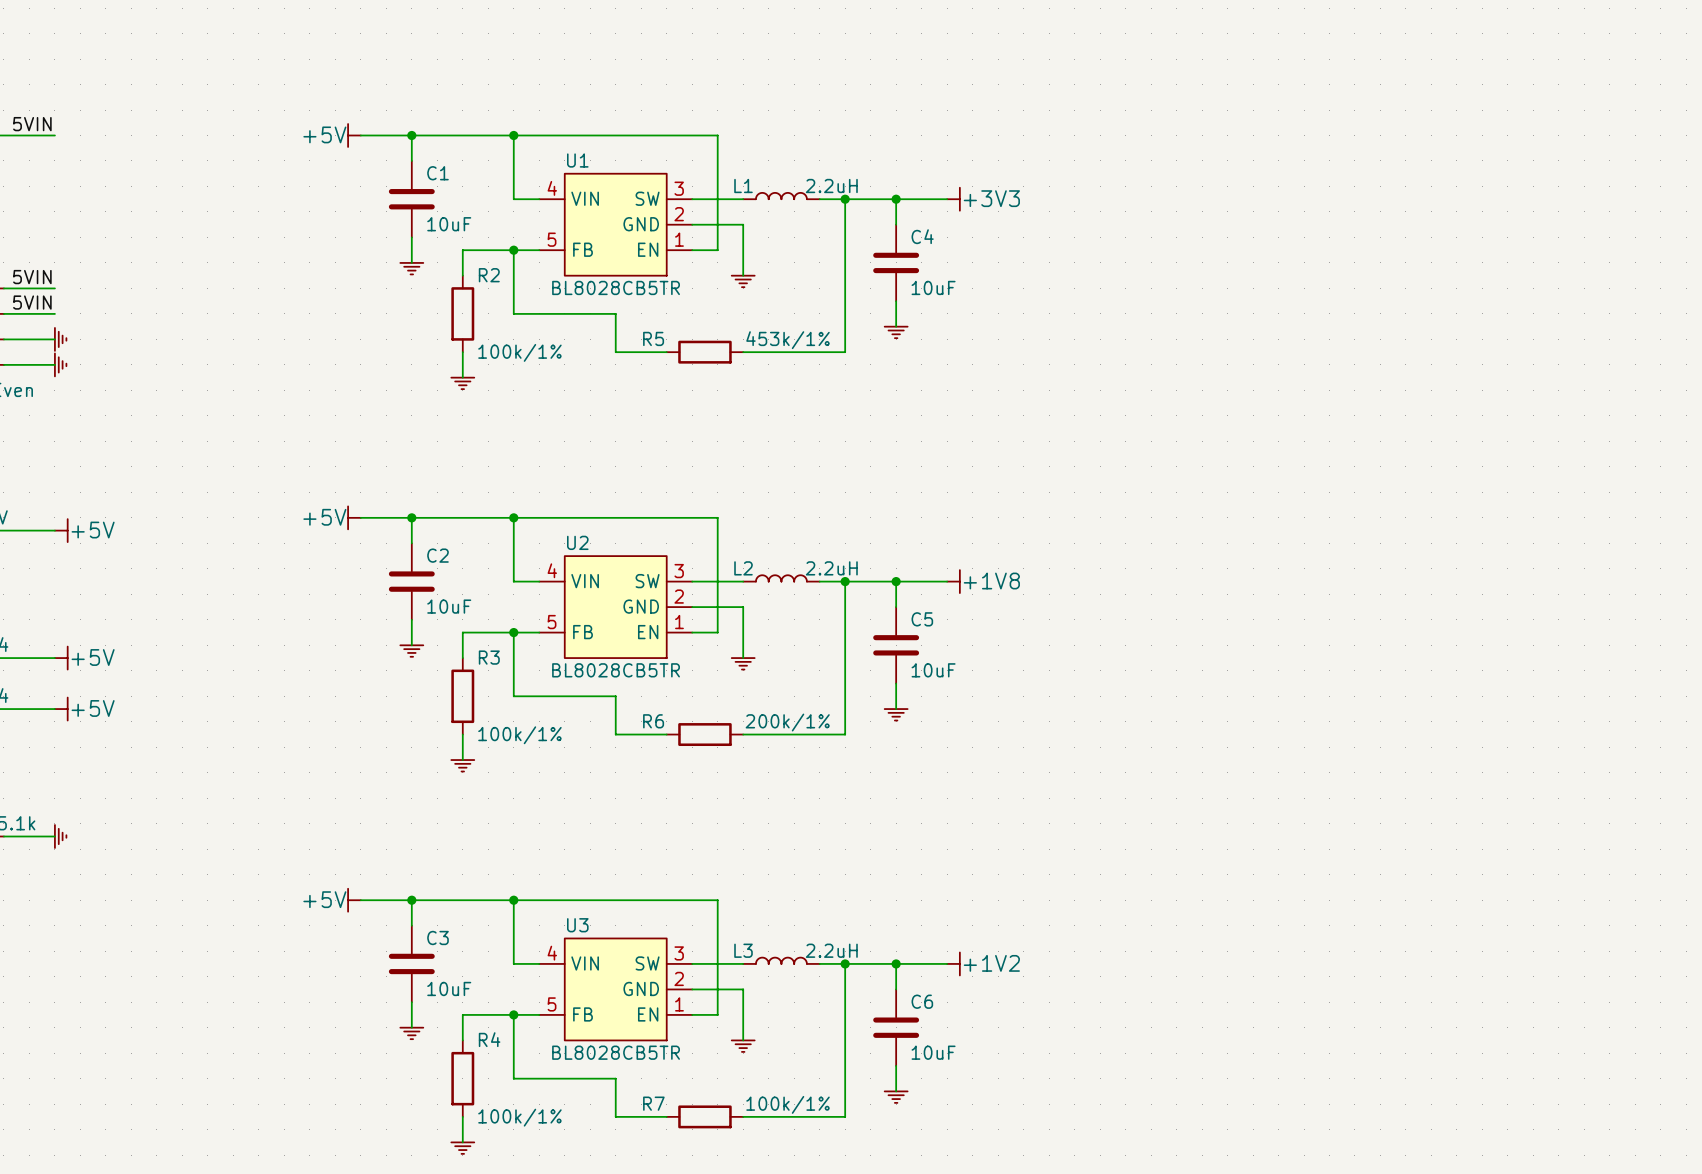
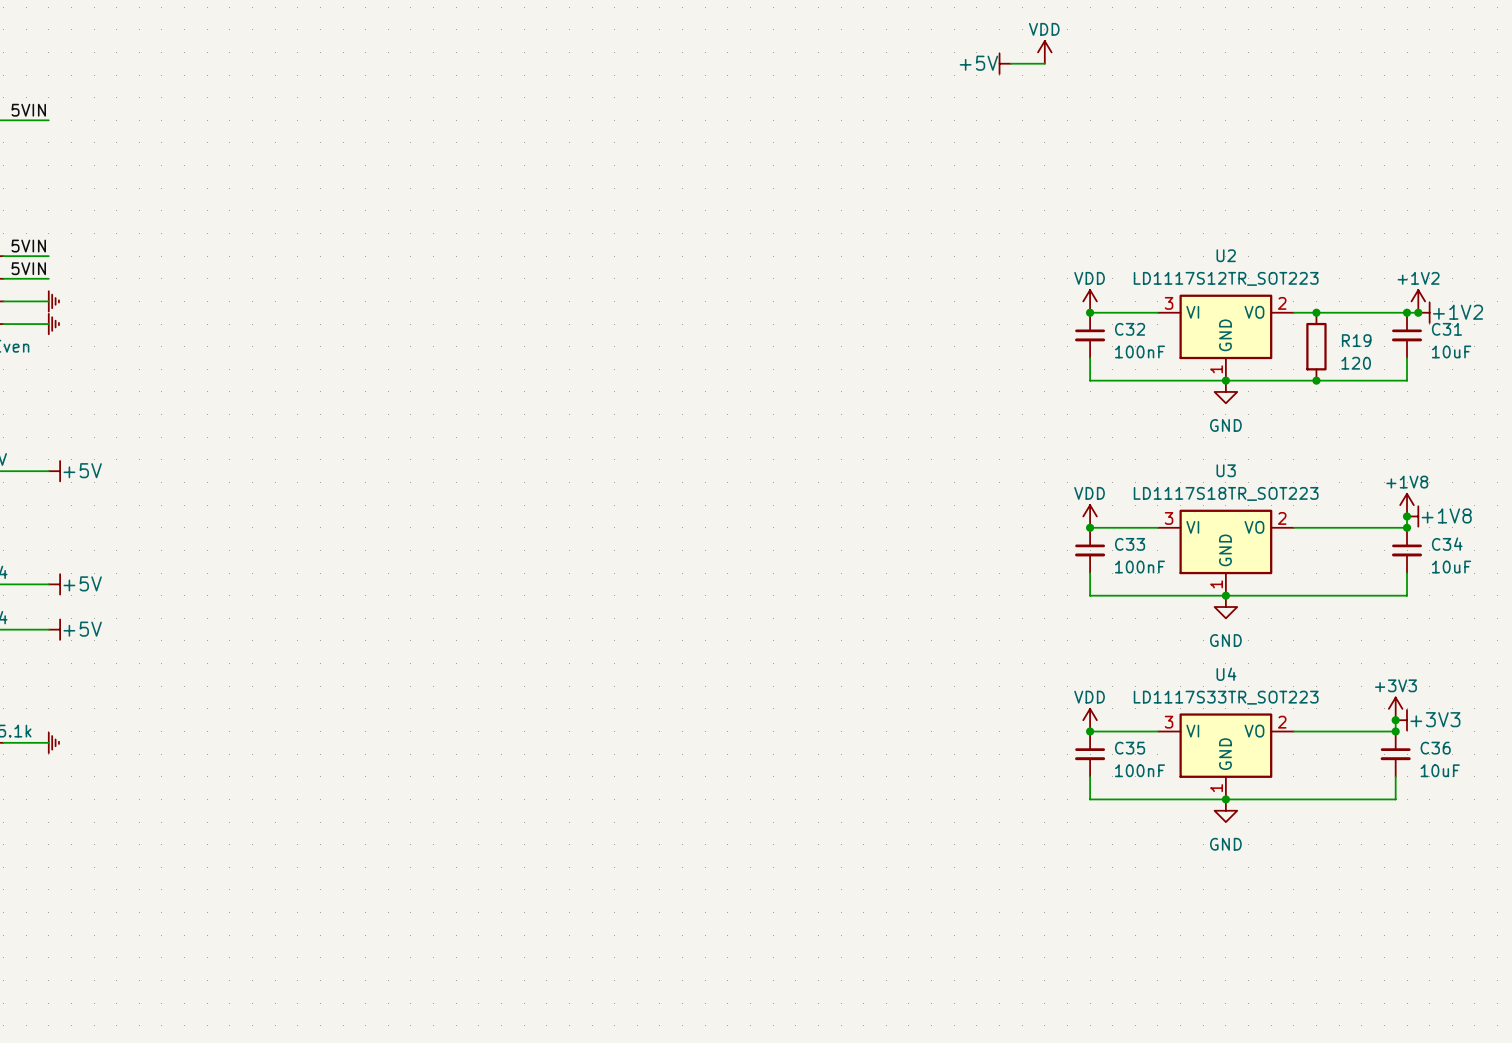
power symbol: none -> VDD (1044, 52)
power symbol: none -> +5V (1005, 63)
wire: none -> (1010, 63) (1044, 63)
power symbol: +5V (354, 135) -> none
wire: (360, 135) (717, 135) (717, 250) (692, 250) -> none
wire: (411, 135) (411, 160) -> none
junction: (411, 135) -> none
wire: (513, 135) (513, 199) (539, 199) -> none
junction: (513, 135) -> none
L1: 2.2uH (781, 196) -> none
C1: 10uF (411, 199) -> none
wire: (692, 199) (743, 199) -> none
wire: (819, 199) (947, 199) -> none
wire: (845, 199) (845, 352) (743, 352) -> none
junction: (845, 199) -> none
wire: (896, 199) (896, 224) -> none
junction: (896, 199) -> none
power symbol: +3V3 (953, 199) -> none
U1: BL8028CB5TR (615, 224) -> none
wire: (692, 224) (743, 224) (743, 275) -> none
wire: (411, 237) (411, 262) -> none
wire: (513, 250) (513, 313) (615, 313) (615, 352) (666, 352) -> none
junction: (513, 250) -> none
wire: (539, 250) (462, 250) (462, 275) -> none
C4: 10uF (896, 262) -> none
power symbol: (411, 268) -> none
power symbol: (743, 281) -> none
wire: (896, 301) (896, 326) -> none
R2: 100k/1% (462, 313) -> none
power symbol: (896, 332) -> none
power symbol: none -> VDD (1090, 301)
power symbol: none -> +1V2 (1418, 301)
wire: (462, 352) (462, 377) -> none
R5: 453k/1% (704, 352) -> none
wire: none -> (1090, 312) (1157, 312)
junction: none -> (1090, 312)
wire: none -> (1293, 312) (1418, 312)
junction: none -> (1316, 312)
junction: none -> (1407, 312)
junction: none -> (1418, 312)
power symbol: none -> +1V2 (1423, 312)
C32: none -> 100nF (1090, 335)
C31: none -> 10uF (1407, 335)
power symbol: (462, 383) -> none
R19: none -> 120 (1316, 346)
wire: none -> (1090, 358) (1090, 380) (1407, 380) (1407, 358)
junction: none -> (1225, 380)
junction: none -> (1316, 380)
power symbol: none -> GND (1225, 391)
power symbol: +5V (354, 517) -> none
wire: (360, 517) (717, 517) (717, 632) (692, 632) -> none
wire: (411, 517) (411, 543) -> none
junction: (411, 517) -> none
wire: (513, 517) (513, 581) (539, 581) -> none
junction: (513, 517) -> none
U2 name position: U2 (577, 542) -> U2 (1226, 255)
U2 symbol: [539, 555, 693, 659] -> [1157, 294, 1294, 381]
power symbol: none -> +1V8 (1407, 505)
L2: 2.2uH (781, 578) -> none
C2: 10uF (411, 581) -> none
wire: (692, 581) (743, 581) -> none
wire: (819, 581) (947, 581) -> none
wire: (845, 581) (845, 734) (743, 734) -> none
junction: (845, 581) -> none
wire: (896, 581) (896, 607) -> none
junction: (896, 581) -> none
power symbol: +1V8 (953, 581) -> none
power symbol: none -> VDD (1090, 516)
wire: none -> (1407, 516) (1407, 527) (1293, 527)
junction: none -> (1407, 516)
power symbol: none -> +1V8 (1412, 516)
wire: none -> (1090, 527) (1157, 527)
junction: none -> (1090, 527)
junction: none -> (1407, 527)
wire: (692, 607) (743, 607) (743, 658) -> none
wire: (411, 619) (411, 645) -> none
C33: none -> 100nF (1090, 550)
C34: none -> 10uF (1407, 550)
wire: (513, 632) (513, 696) (615, 696) (615, 734) (666, 734) -> none
junction: (513, 632) -> none
wire: (539, 632) (462, 632) (462, 658) -> none
C5: 10uF (896, 645) -> none
wire: none -> (1090, 573) (1090, 595) (1407, 595) (1407, 573)
power symbol: (411, 651) -> none
power symbol: (743, 663) -> none
U2 value: BL8028CB5TR (616, 670) -> LD1117S12TR_SOT223 (1226, 278)
junction: none -> (1225, 595)
wire: (896, 683) (896, 709) -> none
power symbol: none -> GND (1225, 607)
R3: 100k/1% (462, 696) -> none
power symbol: (896, 714) -> none
wire: (462, 734) (462, 760) -> none
R6: 200k/1% (704, 734) -> none
power symbol: (462, 765) -> none
power symbol: none -> +3V3 (1395, 708)
power symbol: none -> VDD (1090, 720)
wire: none -> (1395, 720) (1395, 731) (1293, 731)
junction: none -> (1395, 720)
power symbol: none -> +3V3 (1401, 720)
wire: none -> (1090, 731) (1157, 731)
junction: none -> (1090, 731)
junction: none -> (1395, 731)
C35: none -> 100nF (1090, 754)
C36: none -> 10uF (1395, 754)
U4: none -> LD1117S33TR_SOT223 (1225, 756)
wire: none -> (1090, 776) (1090, 799) (1395, 799) (1395, 776)
power symbol: +5V (354, 900) -> none
wire: (360, 900) (717, 900) (717, 1014) (692, 1014) -> none
wire: (411, 900) (411, 925) -> none
junction: (411, 900) -> none
wire: (513, 900) (513, 963) (539, 963) -> none
junction: (513, 900) -> none
junction: none -> (1225, 799)
power symbol: none -> GND (1225, 810)
U3 name position: U3 (577, 925) -> U3 (1226, 470)
U3 symbol: [539, 937, 693, 1042] -> [1157, 509, 1294, 596]
L3: 2.2uH (781, 960) -> none
C3: 10uF (411, 963) -> none
wire: (692, 963) (743, 963) -> none
wire: (819, 963) (947, 963) -> none
wire: (845, 963) (845, 1116) (743, 1116) -> none
junction: (845, 963) -> none
wire: (896, 963) (896, 989) -> none
junction: (896, 963) -> none
power symbol: +1V2 (953, 963) -> none
wire: (692, 989) (743, 989) (743, 1040) -> none
wire: (411, 1002) (411, 1027) -> none
wire: (513, 1014) (513, 1078) (615, 1078) (615, 1116) (666, 1116) -> none
junction: (513, 1014) -> none
wire: (539, 1014) (462, 1014) (462, 1040) -> none
C6: 10uF (896, 1027) -> none
power symbol: (411, 1033) -> none
power symbol: (743, 1046) -> none
U3 value: BL8028CB5TR (616, 1052) -> LD1117S18TR_SOT223 (1226, 493)
wire: (896, 1065) (896, 1091) -> none
R4: 100k/1% (462, 1078) -> none
power symbol: (896, 1097) -> none
wire: (462, 1116) (462, 1142) -> none
R7: 100k/1% (704, 1116) -> none
power symbol: (462, 1148) -> none

